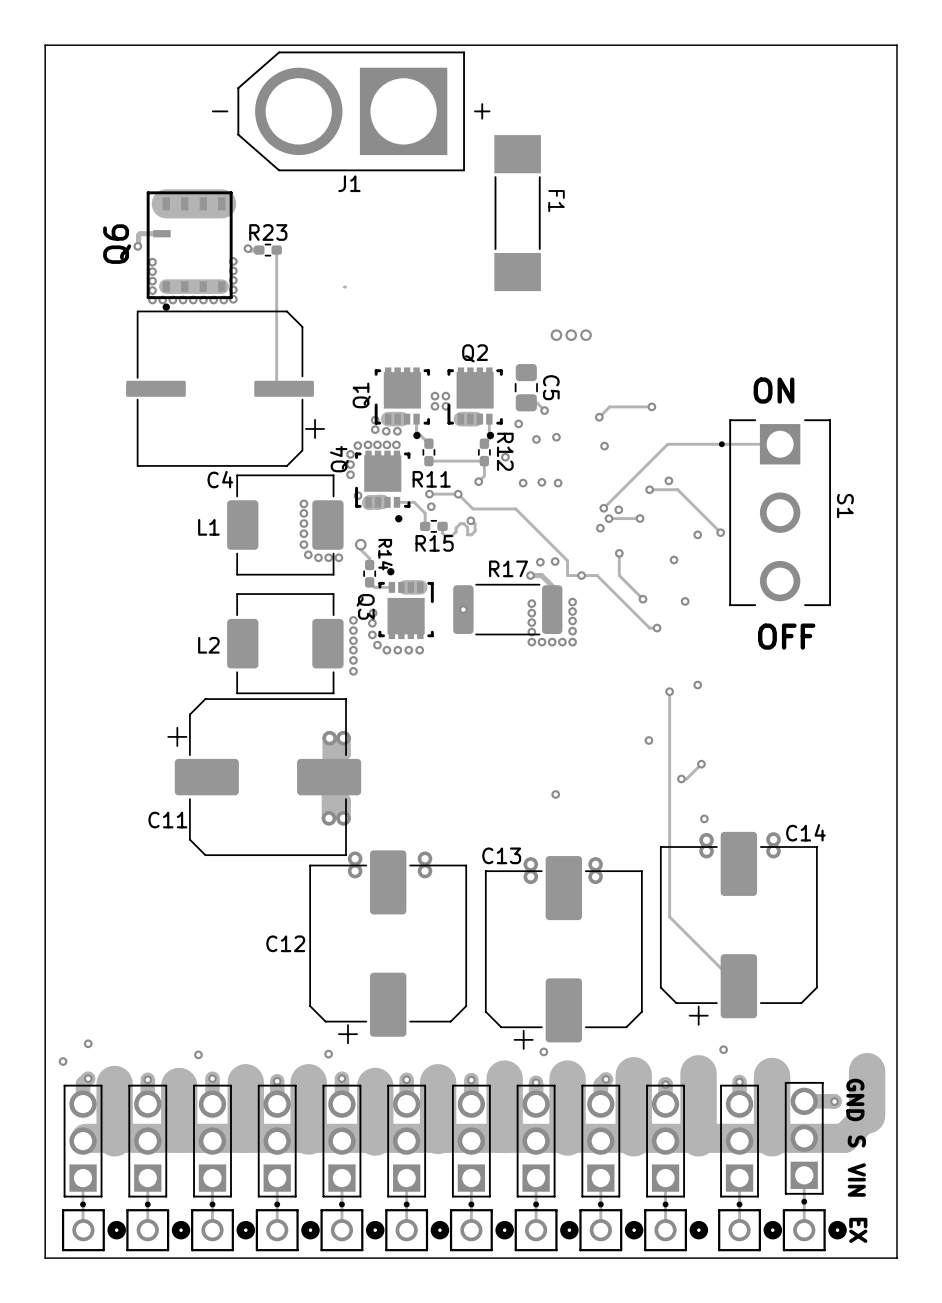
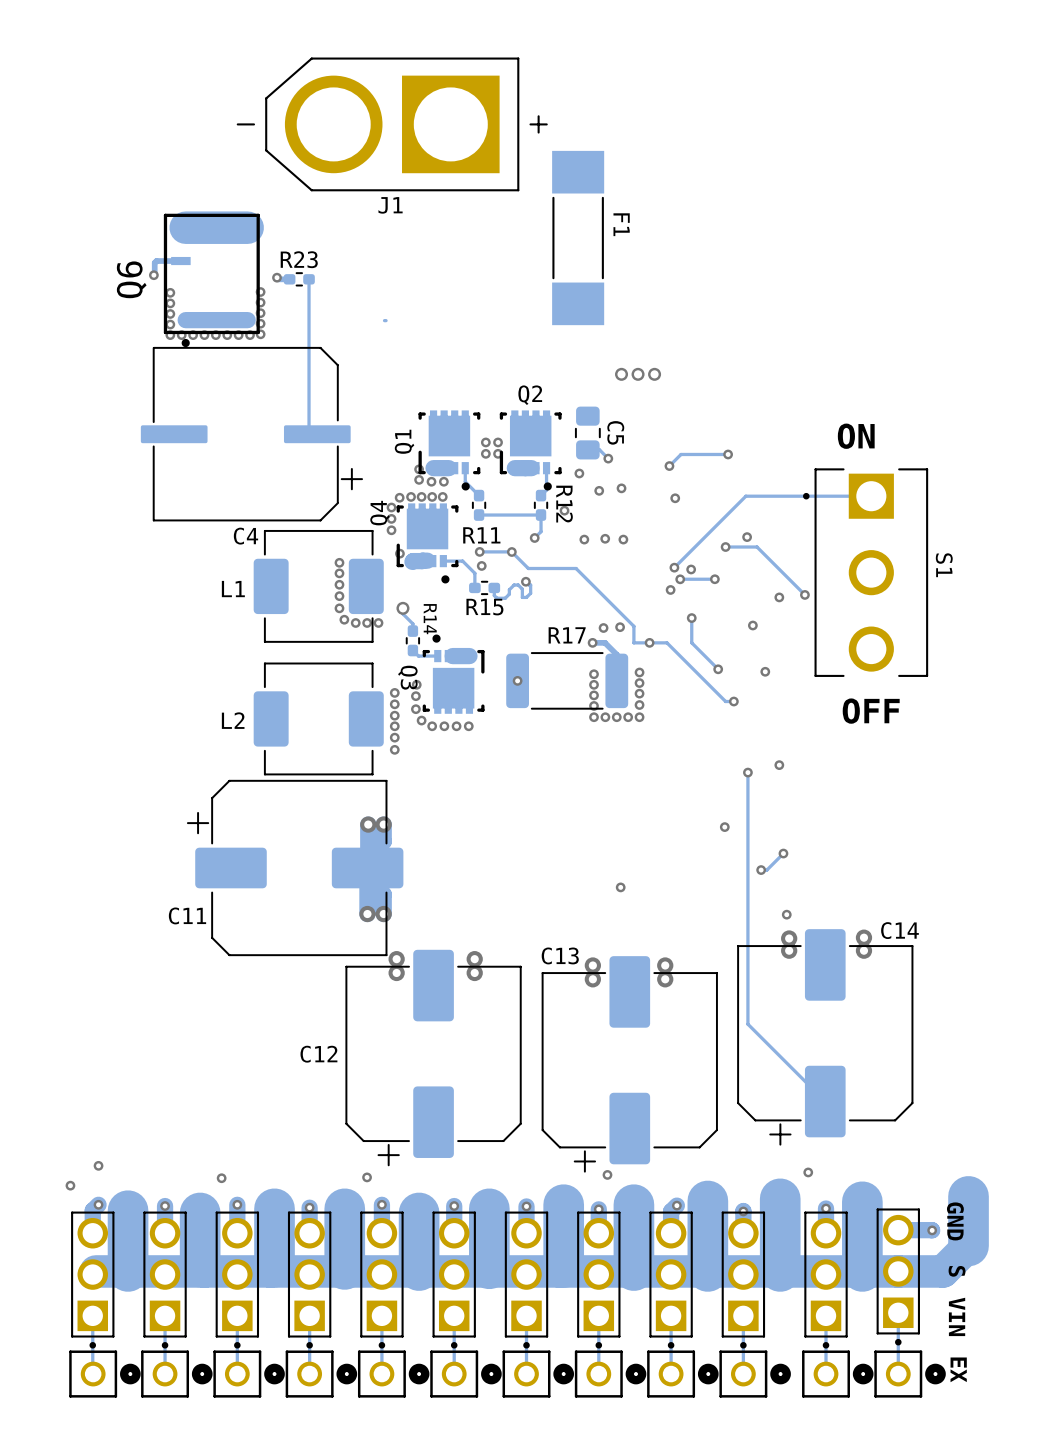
board edge: (896, 45) (45, 45) (45, 1258) (896, 1258) (896, 45) -> none

